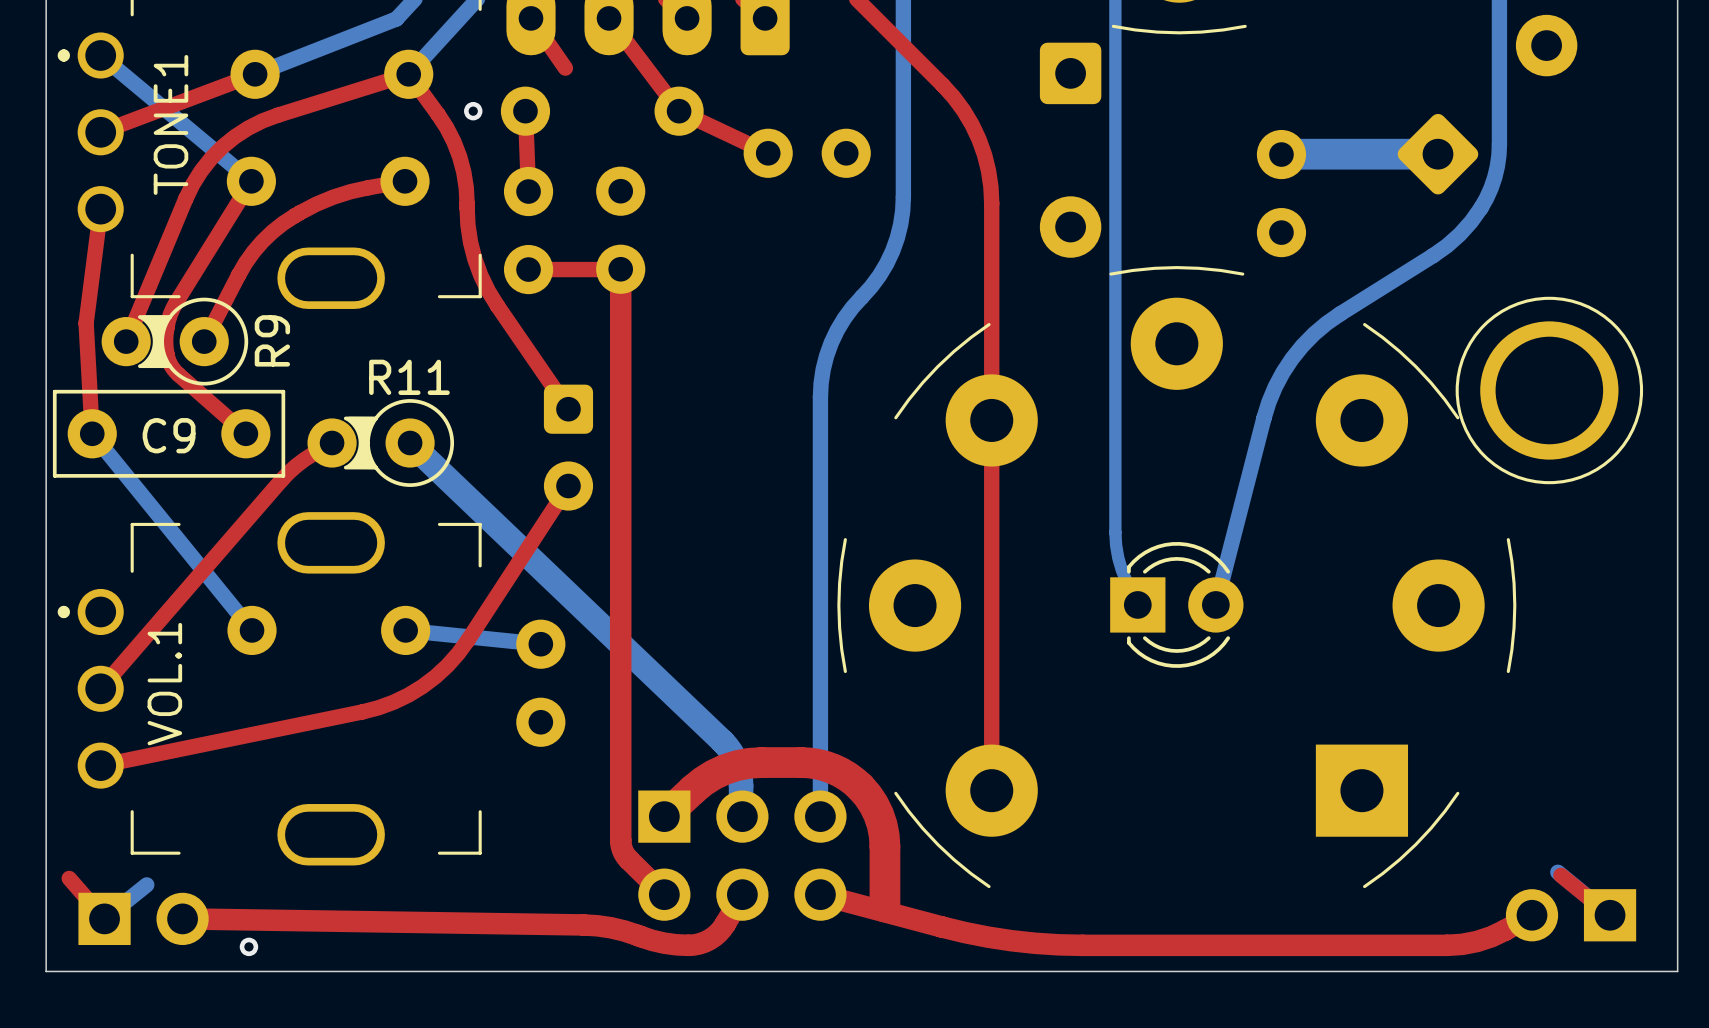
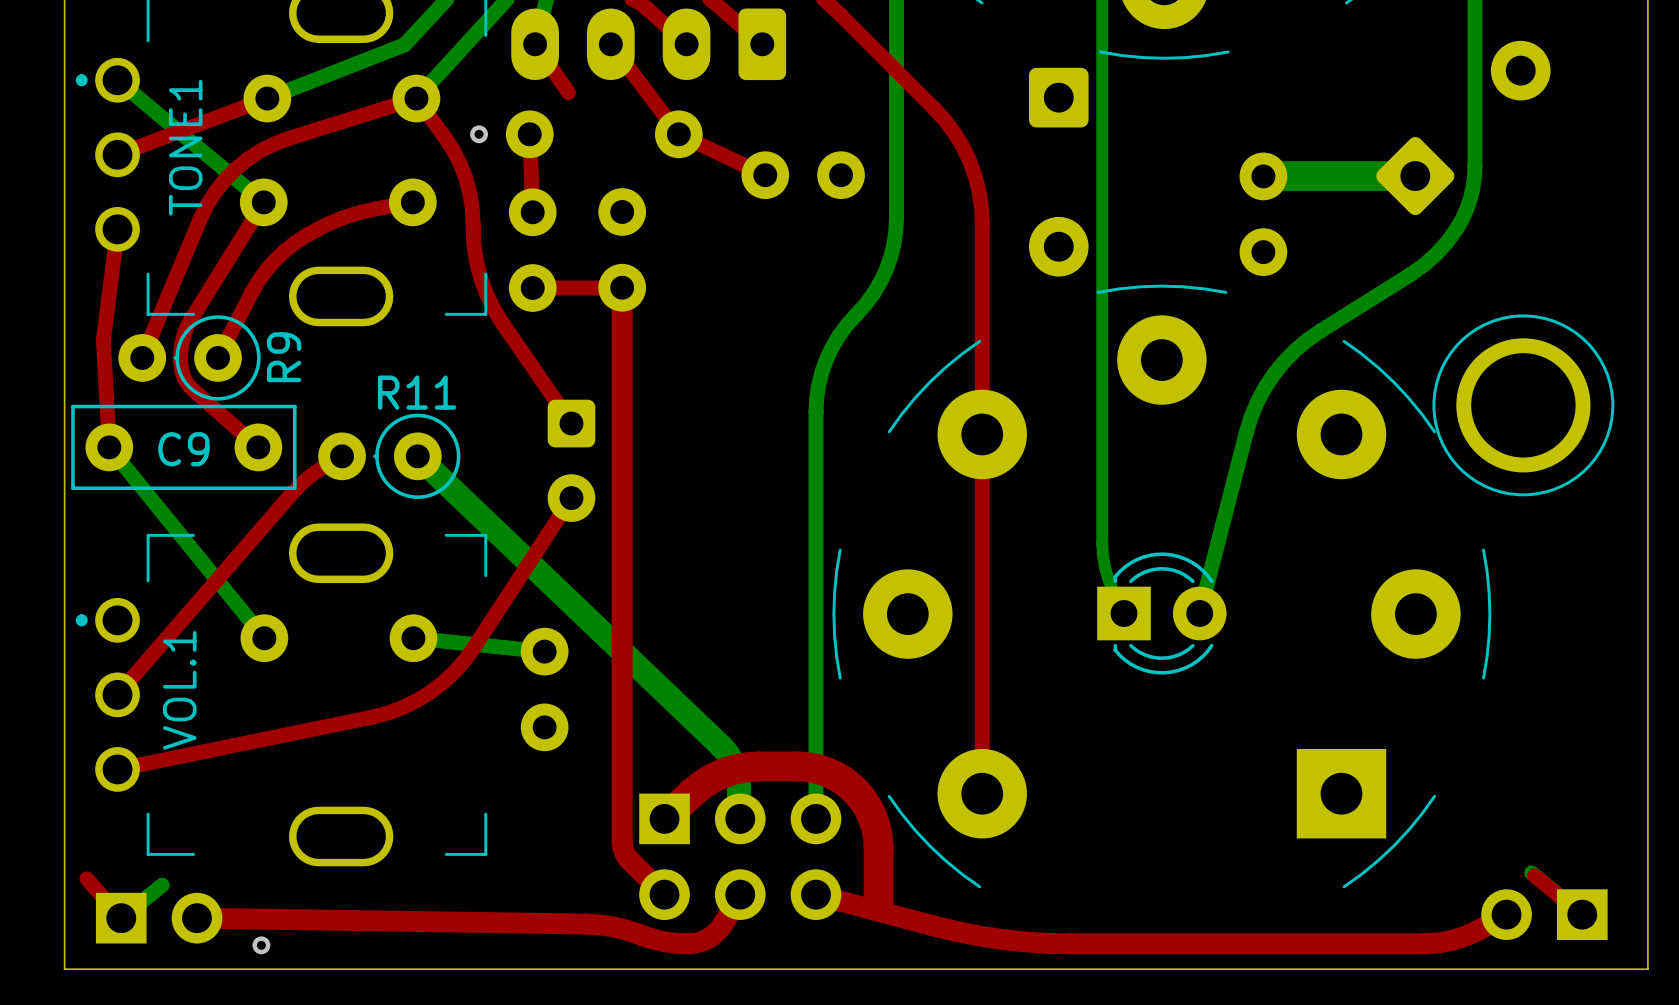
R9 footprint: [101, 297, 249, 386] -> [118, 315, 261, 401]
R11 footprint: [307, 399, 455, 487] -> [318, 413, 461, 499]

